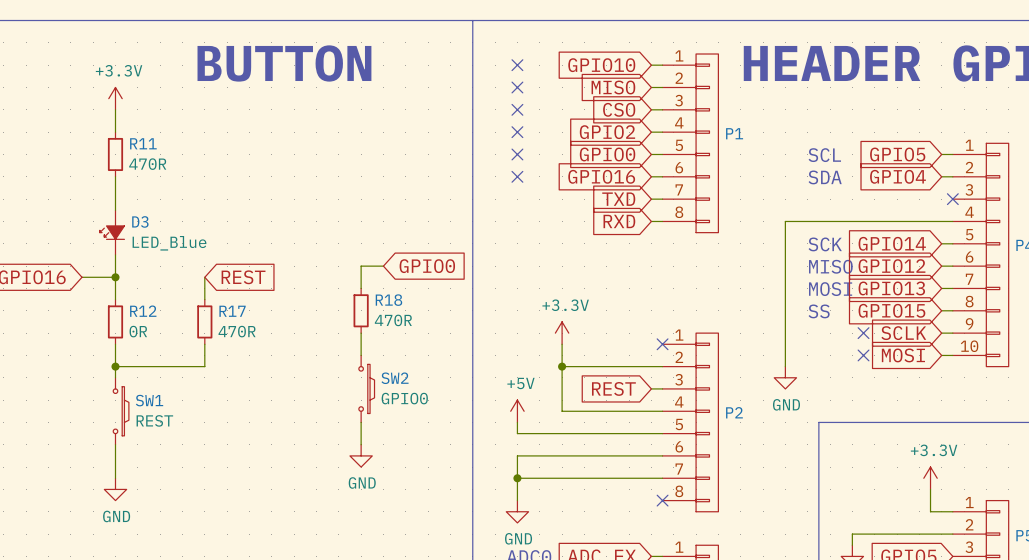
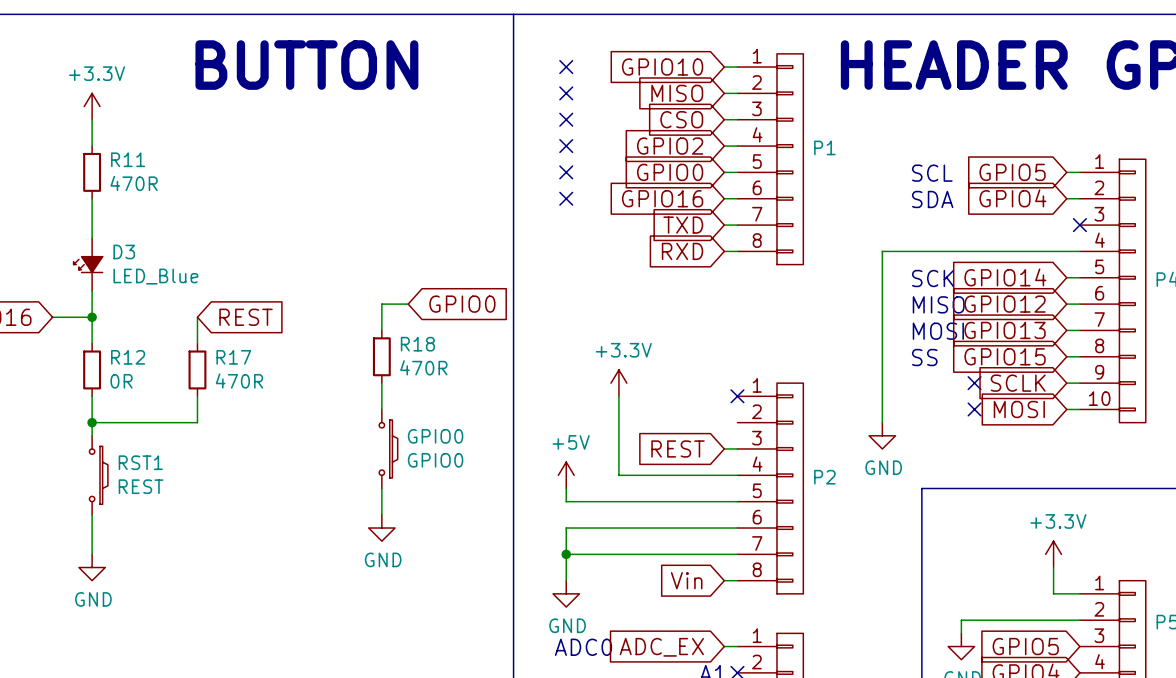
wire: (562, 366) (662, 366) -> none
junction: (562, 366) -> none
SW2 name: SW2 (395, 378) -> GPIO0 (435, 436)
SW1 name: SW1 (149, 400) -> RST1 (140, 462)
global label: none -> Vin (686, 580)
wire: none -> (724, 580) (737, 580)
no-connect mark: (662, 500) -> none

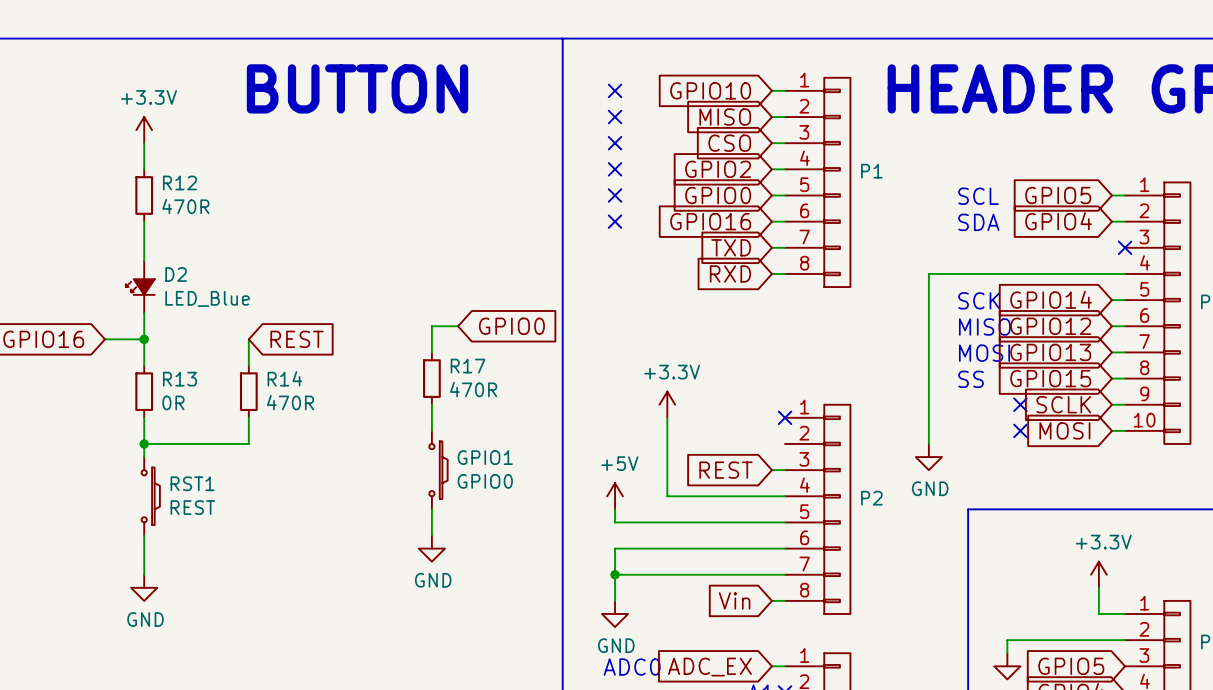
R11 name: R11 (128, 159) -> R12 (179, 182)
D3 name: D3 (124, 251) -> D2 (176, 274)
R18 name: R18 (417, 344) -> R17 (468, 366)
R12 name: R12 (128, 357) -> R13 (179, 379)
R17 name: R17 (233, 357) -> R14 (284, 378)
GPIO0 name: GPIO0 (435, 436) -> GPIO1 (485, 457)

